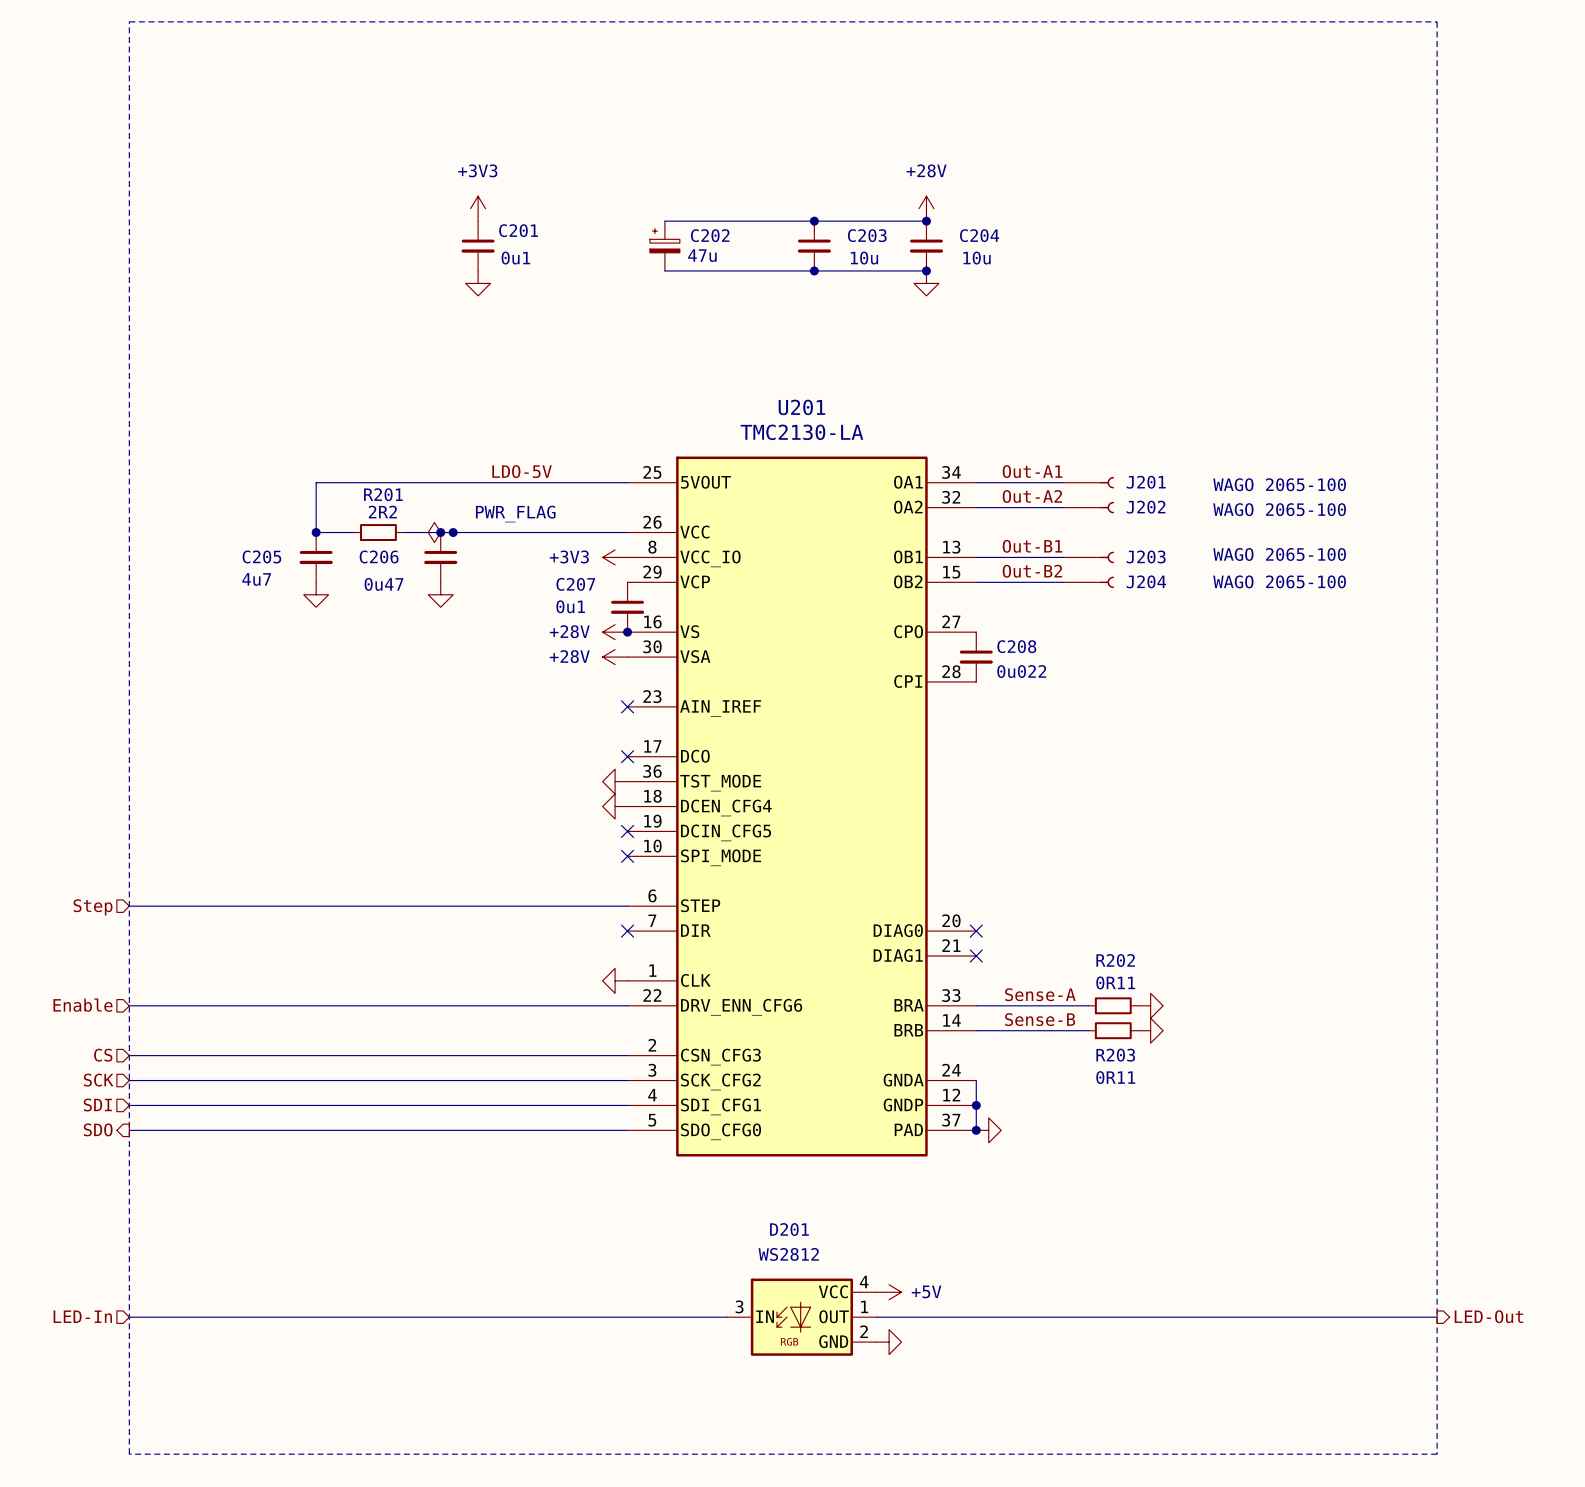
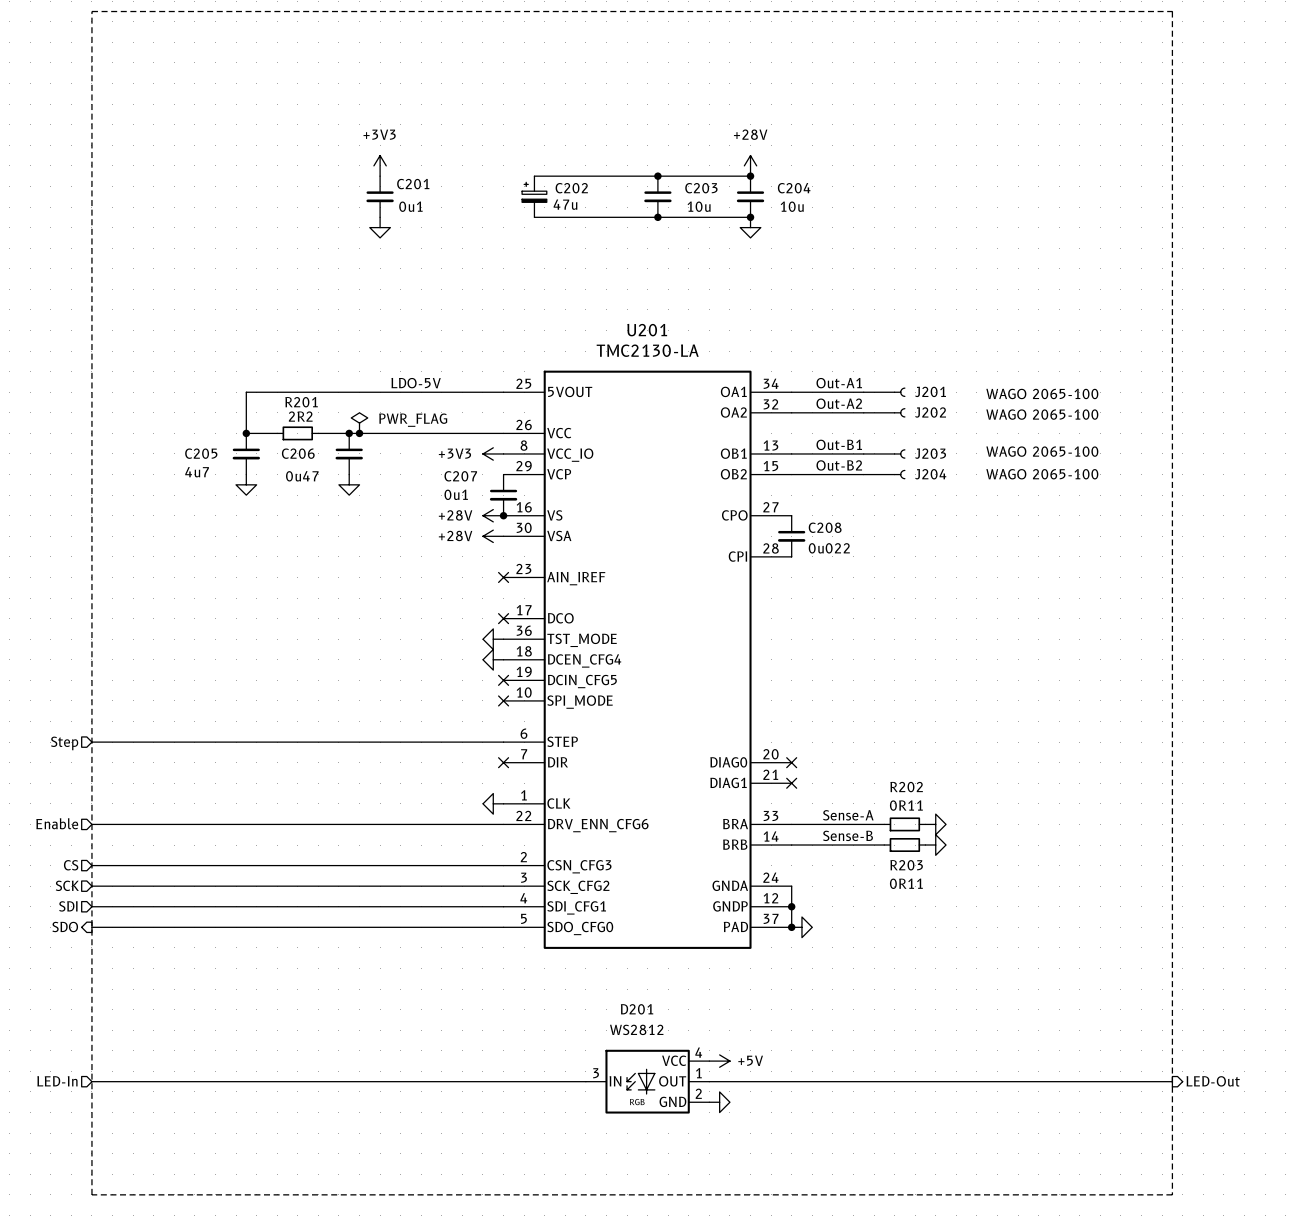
power symbol rotation: 0° (440, 532) -> 90° clockwise (359, 423)
power symbol position: PWR_FLAG (440, 532) -> PWR_FLAG (359, 423)

